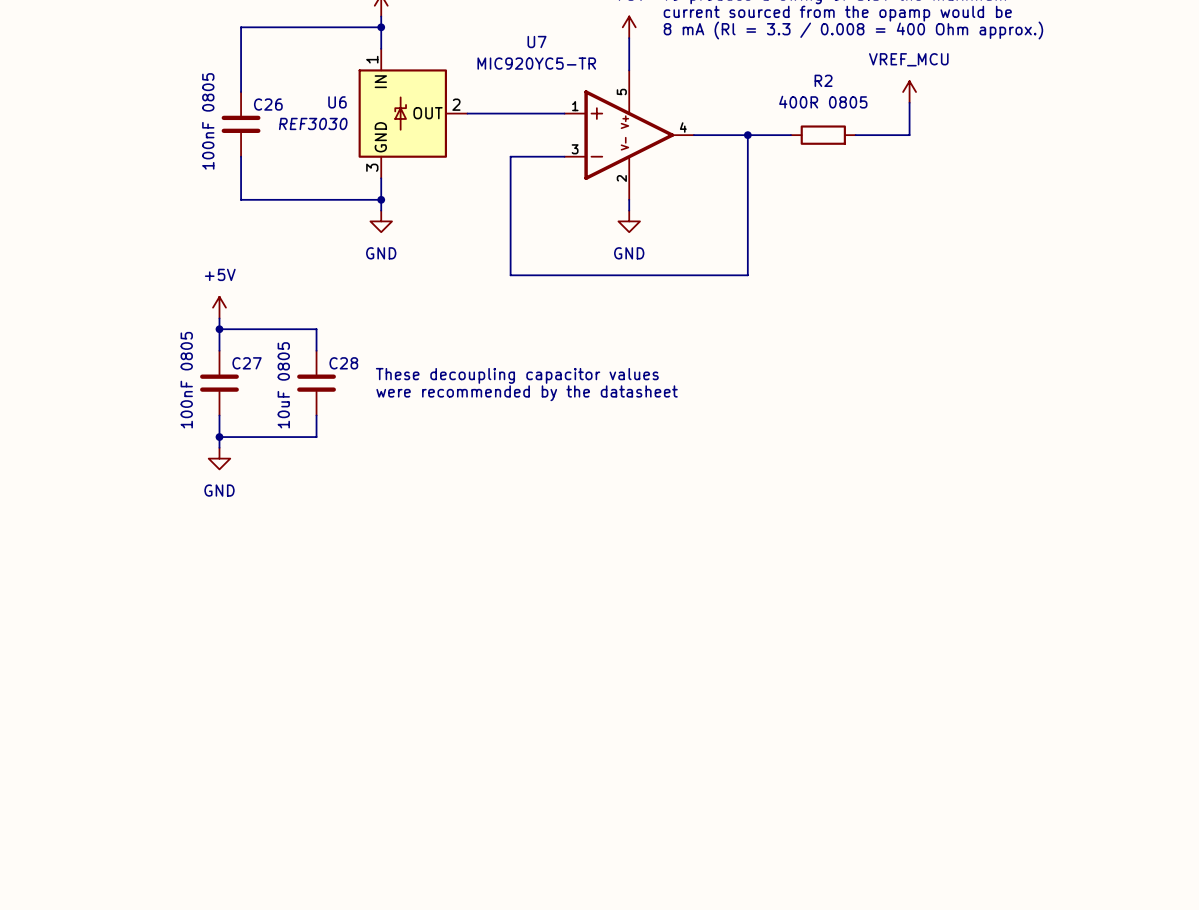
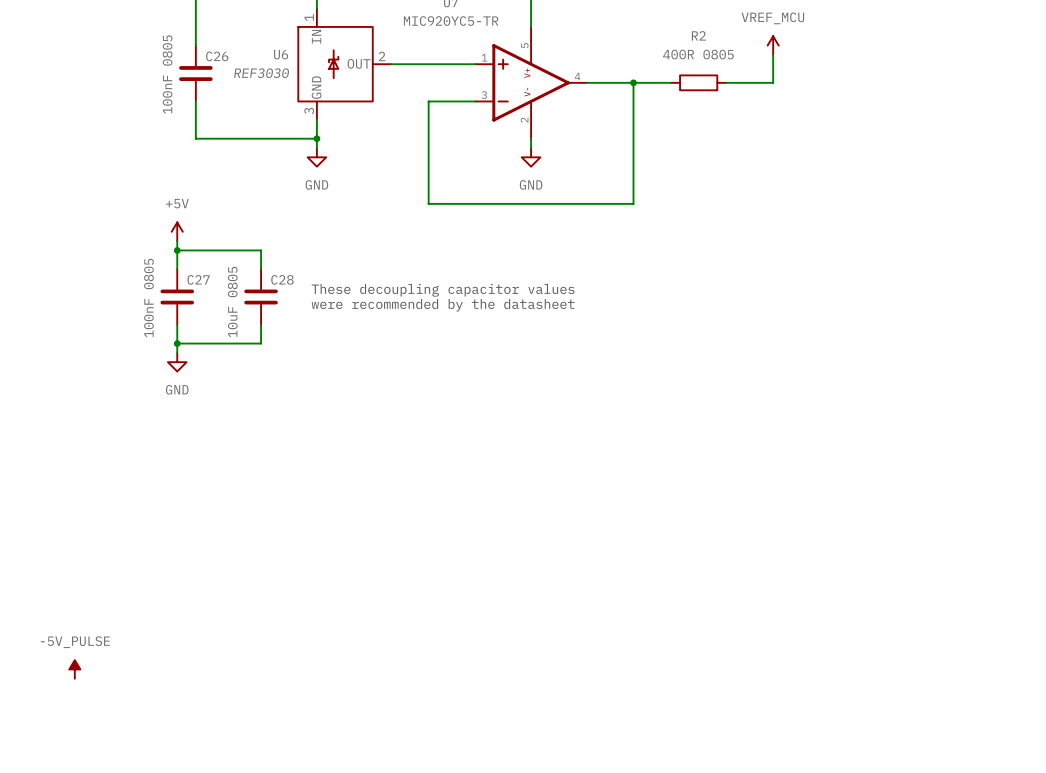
power symbol: none -> -5V_PULSE (74, 669)

